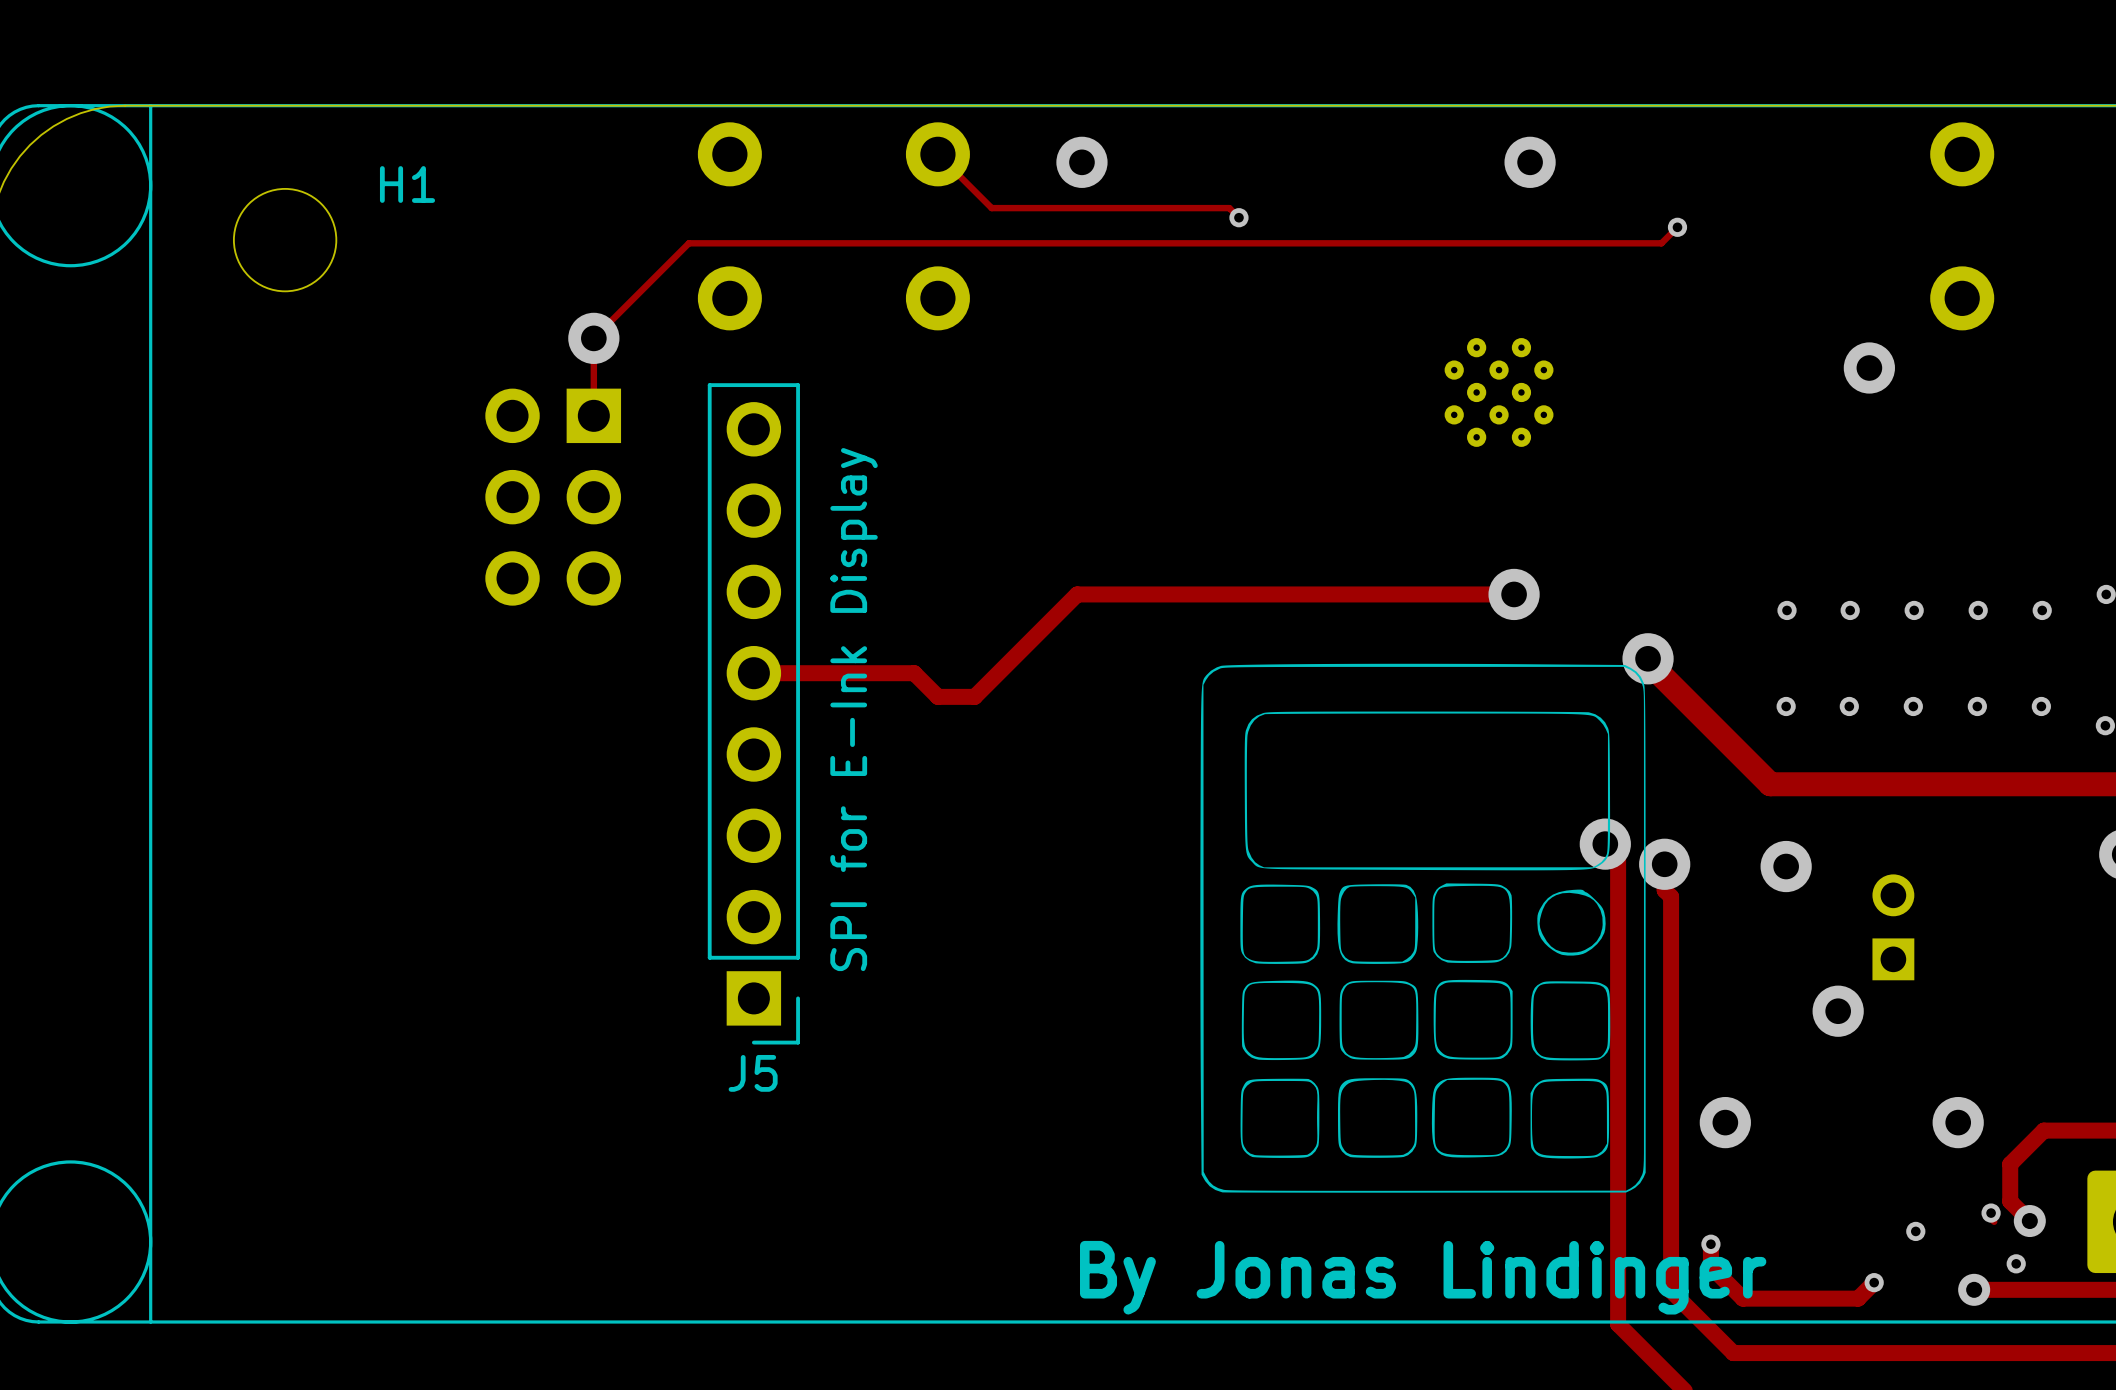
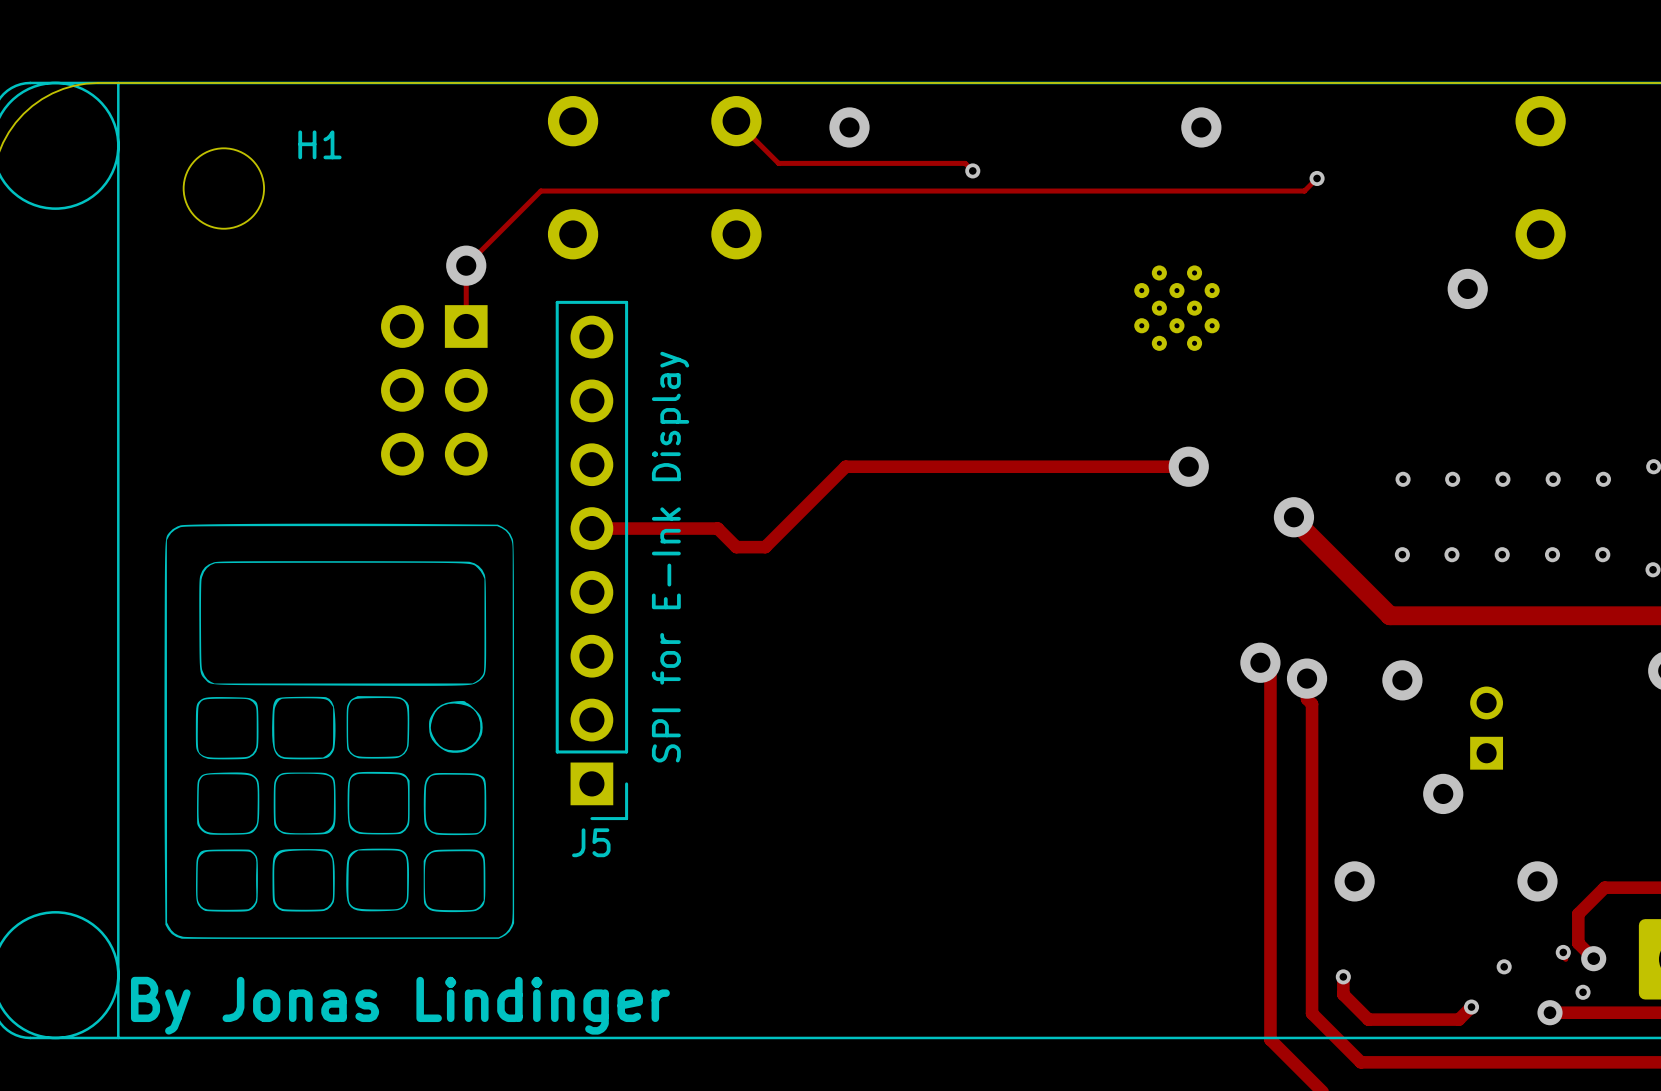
drawing: [1200, 663, 1646, 1193] -> none
drawing: none -> [164, 523, 515, 939]
text: By Jonas Lindinger (1423, 1277) -> none
text: none -> By Jonas Lindinger (400, 1005)

